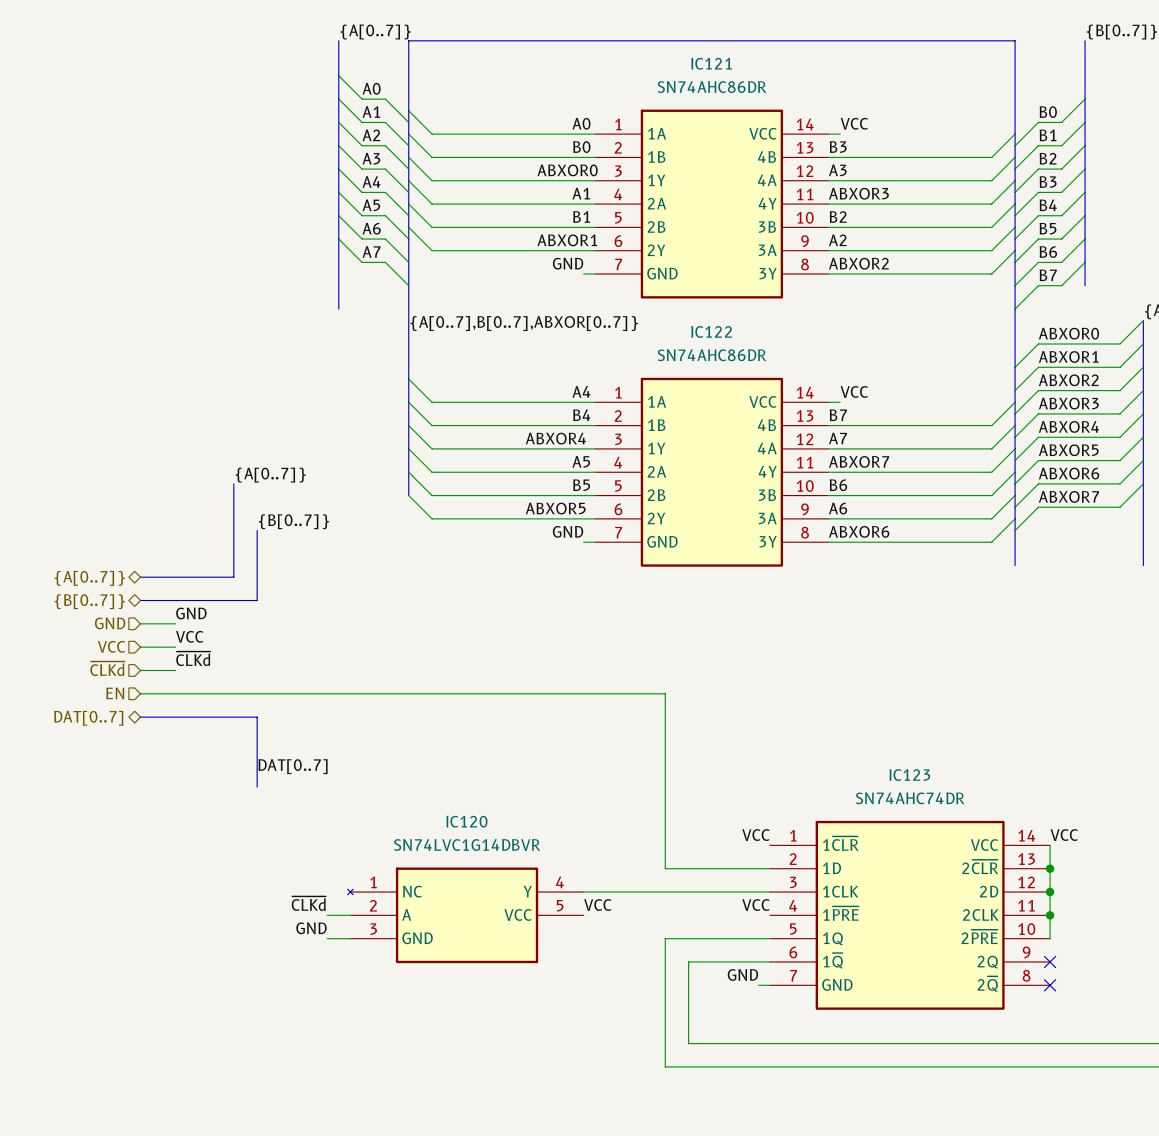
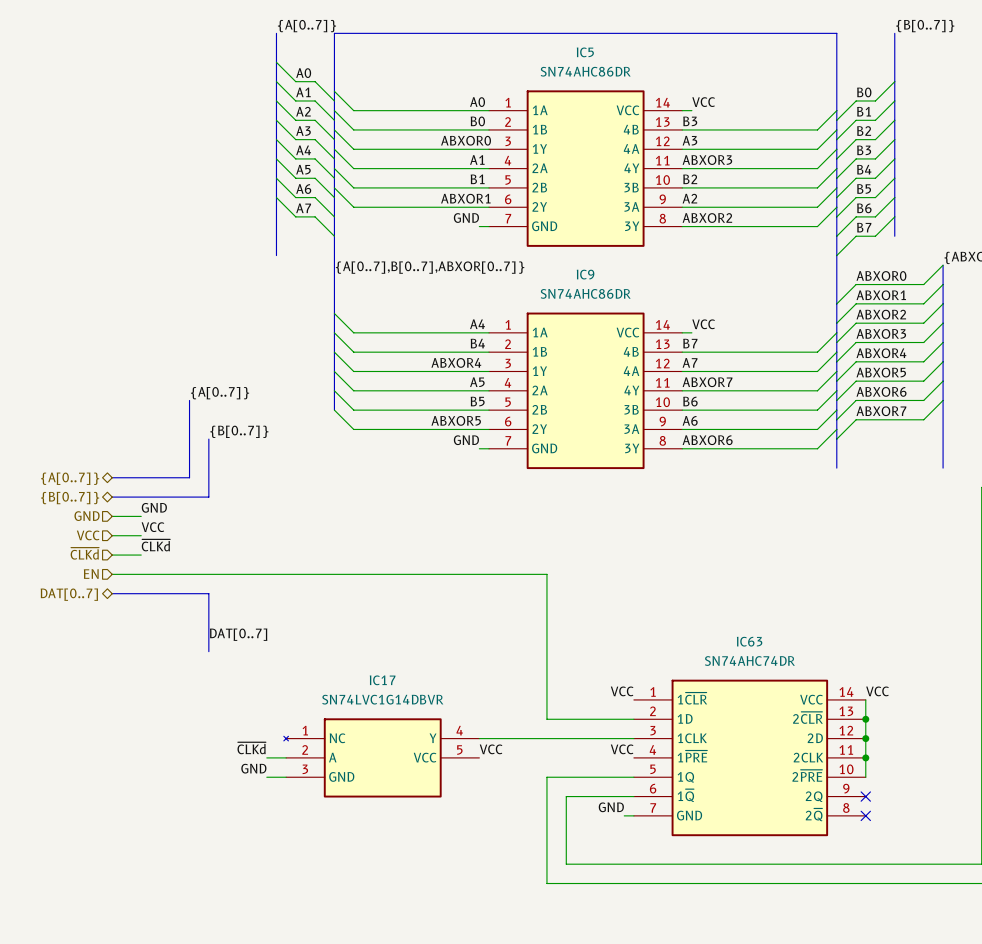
IC121 name: IC121 (711, 63) -> IC5 (585, 52)
IC122 name: IC122 (711, 331) -> IC9 (585, 274)
IC123 name: IC123 (909, 775) -> IC63 (749, 641)
IC120 name: IC120 (466, 821) -> IC17 (382, 680)

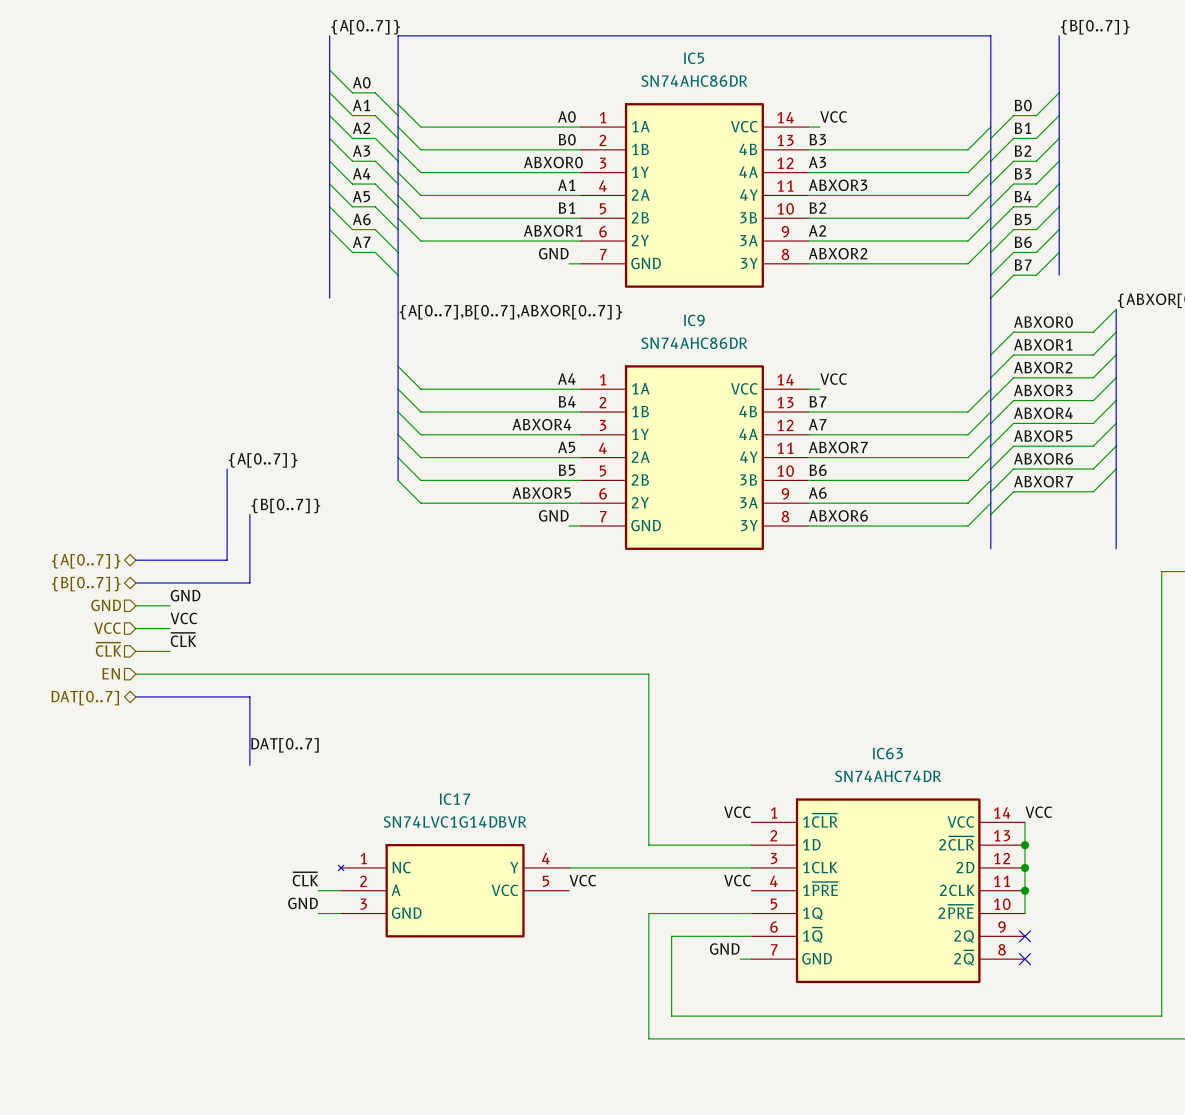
label: ~{CLKd} (155, 545) -> ~{CLK} (183, 639)
hierarchical label: ~{CLKd} (84, 553) -> ~{CLK} (108, 649)
label: ~{CLKd} (251, 748) -> ~{CLK} (305, 879)

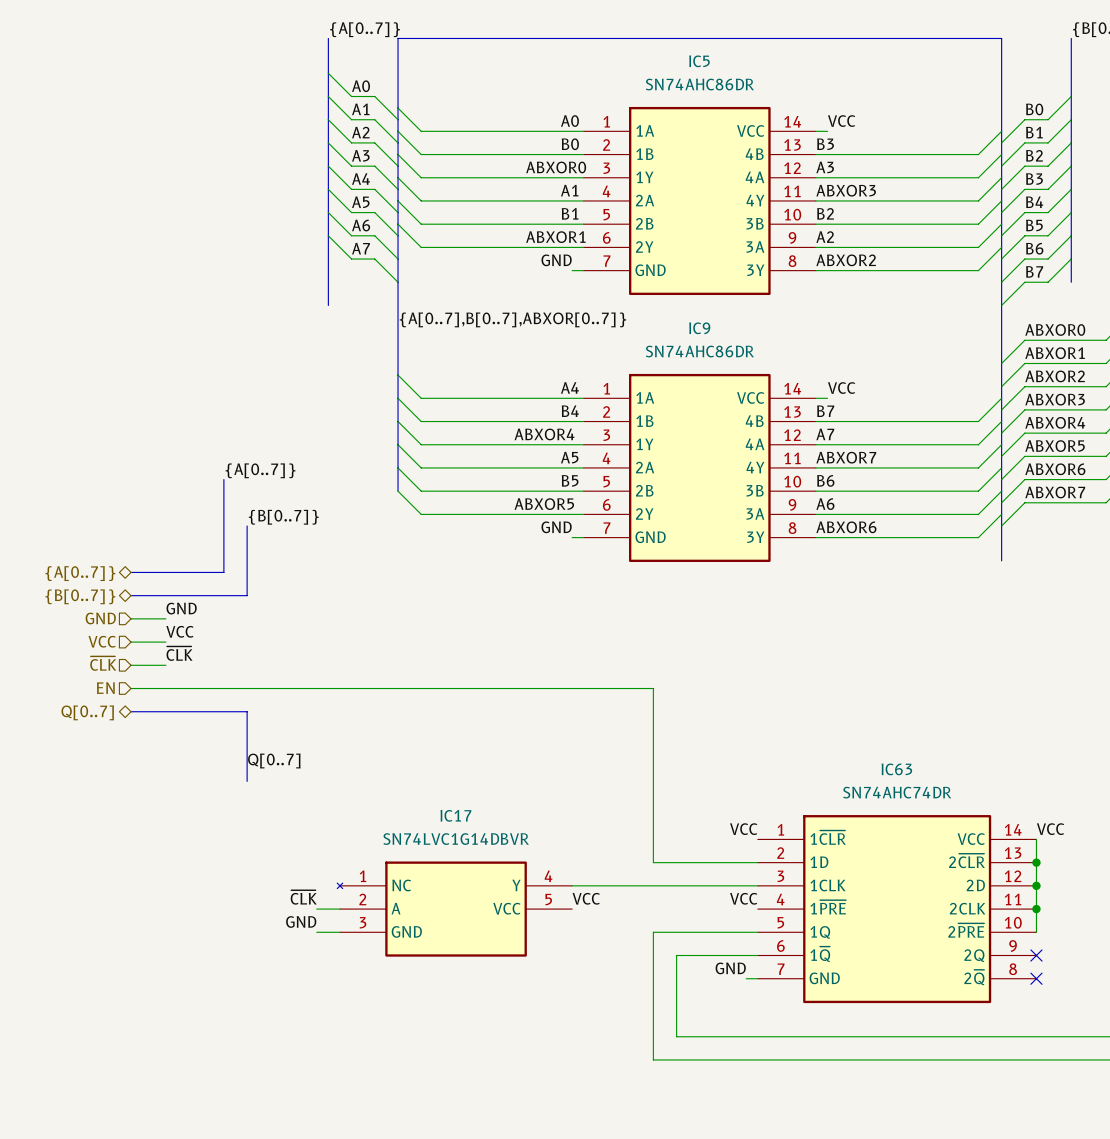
hierarchical label: DAT[0..7] (85, 698) -> Q[0..7] (87, 712)
label: DAT[0..7] (285, 745) -> Q[0..7] (274, 761)

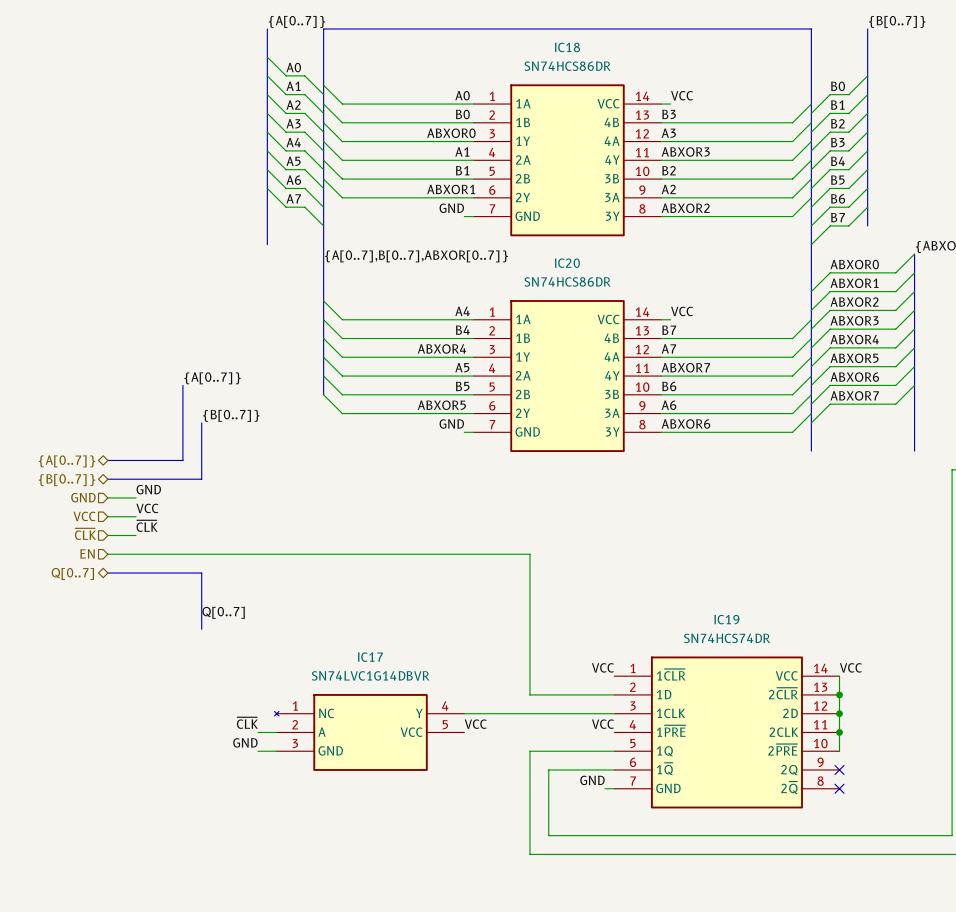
IC5 name: IC5 (699, 61) -> IC18 (567, 47)
IC5 value: SN74AHC86DR (699, 84) -> SN74HCS86DR (567, 66)
IC9 name: IC9 (699, 328) -> IC20 (567, 263)
IC9 value: SN74AHC86DR (699, 351) -> SN74HCS86DR (567, 281)
IC63 name: IC63 (896, 769) -> IC19 (726, 619)
IC63 value: SN74AHC74DR (897, 792) -> SN74HCS74DR (727, 638)

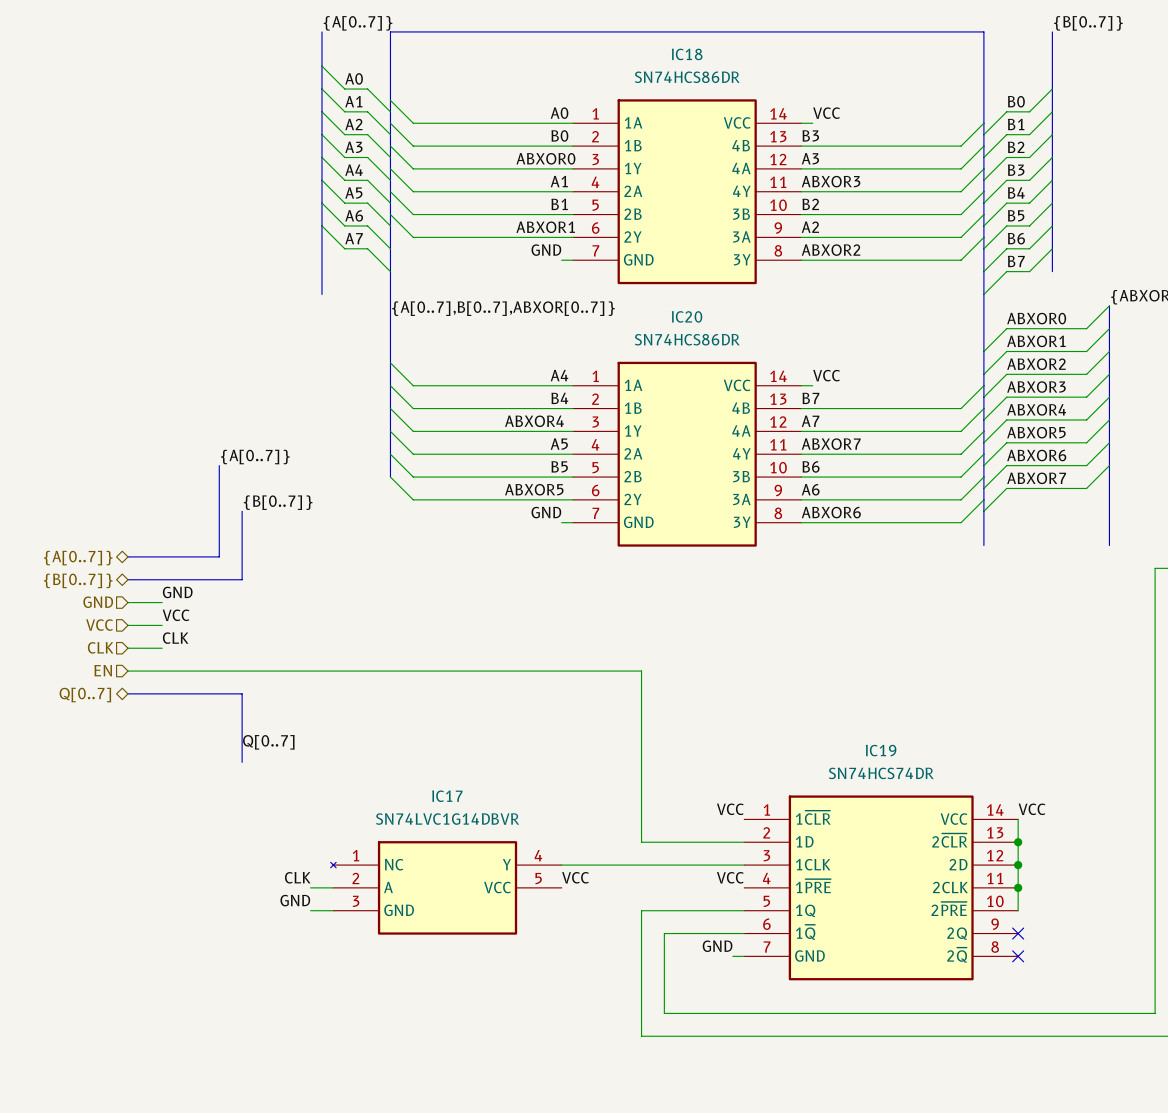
label: ~{CLK} (147, 526) -> CLK (175, 638)
hierarchical label: ~{CLK} (85, 534) -> CLK (100, 647)
label: ~{CLK} (247, 723) -> CLK (297, 877)

